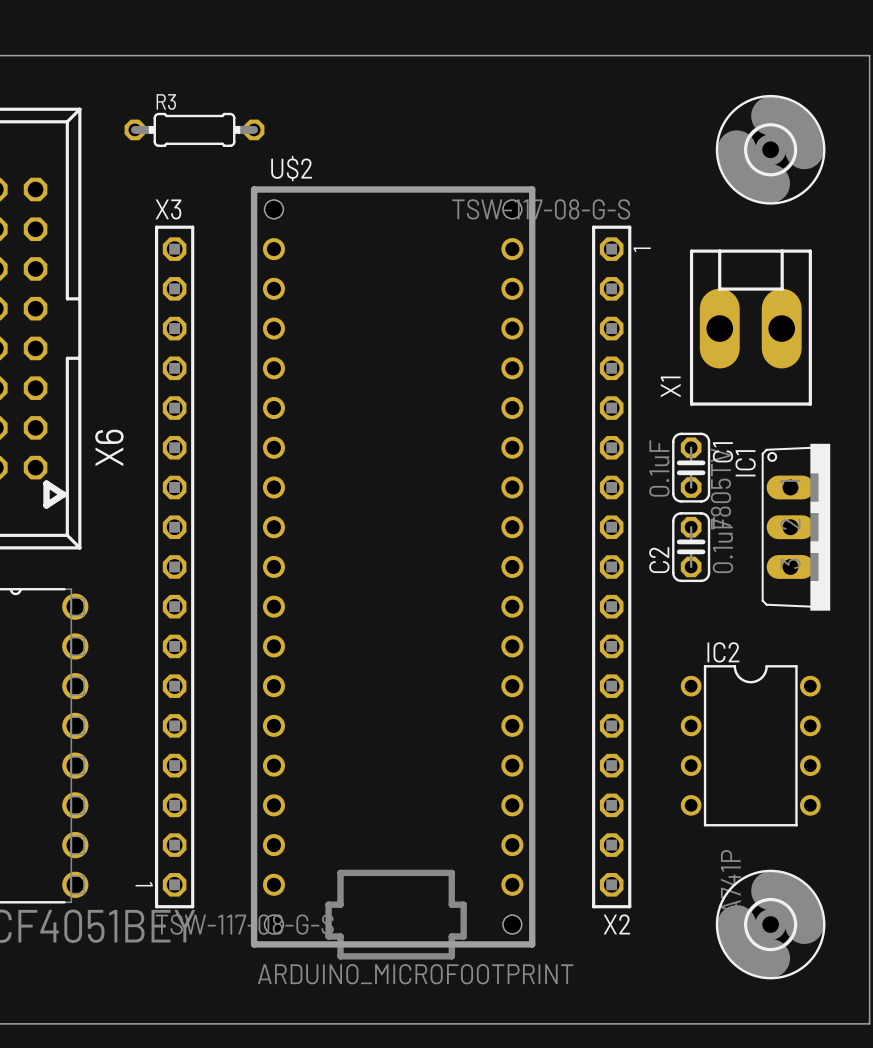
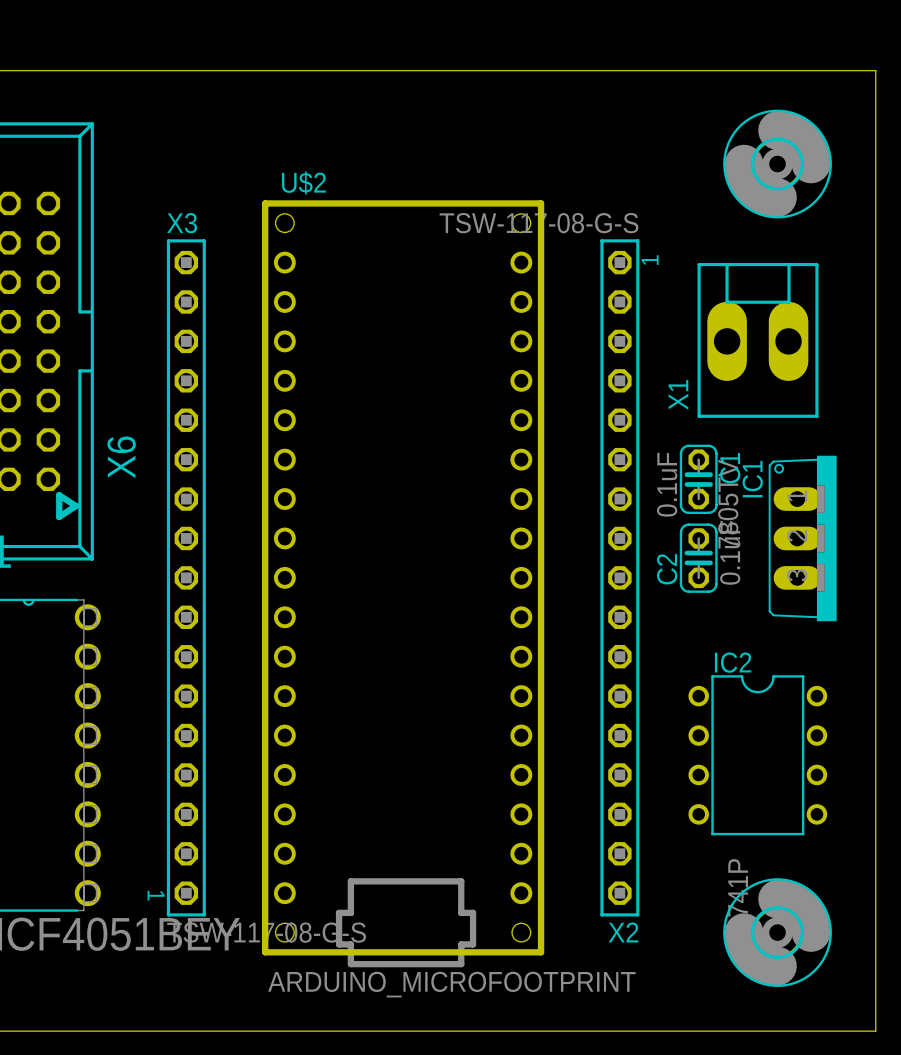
R3: (194, 129) -> none

